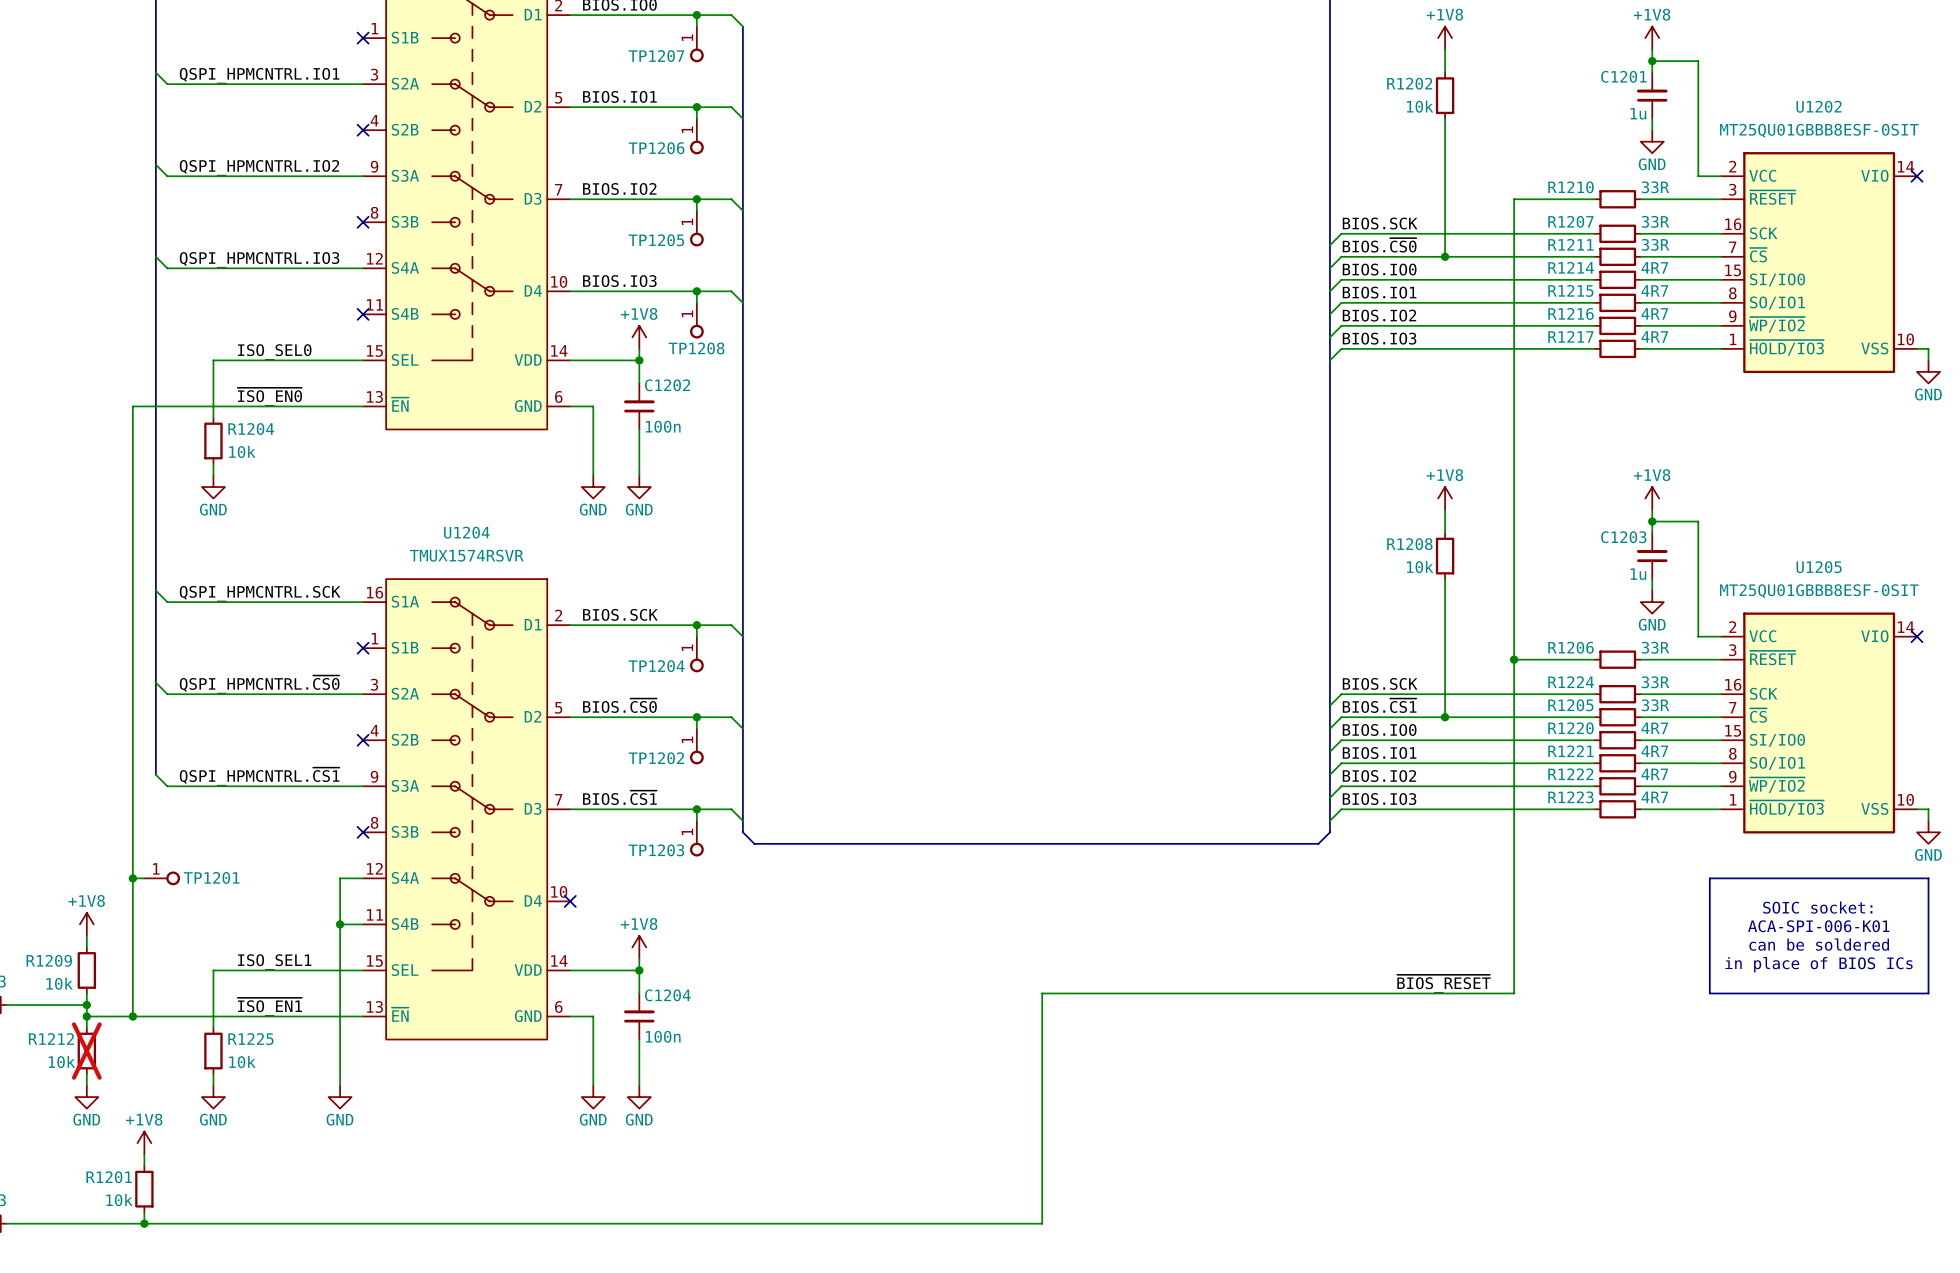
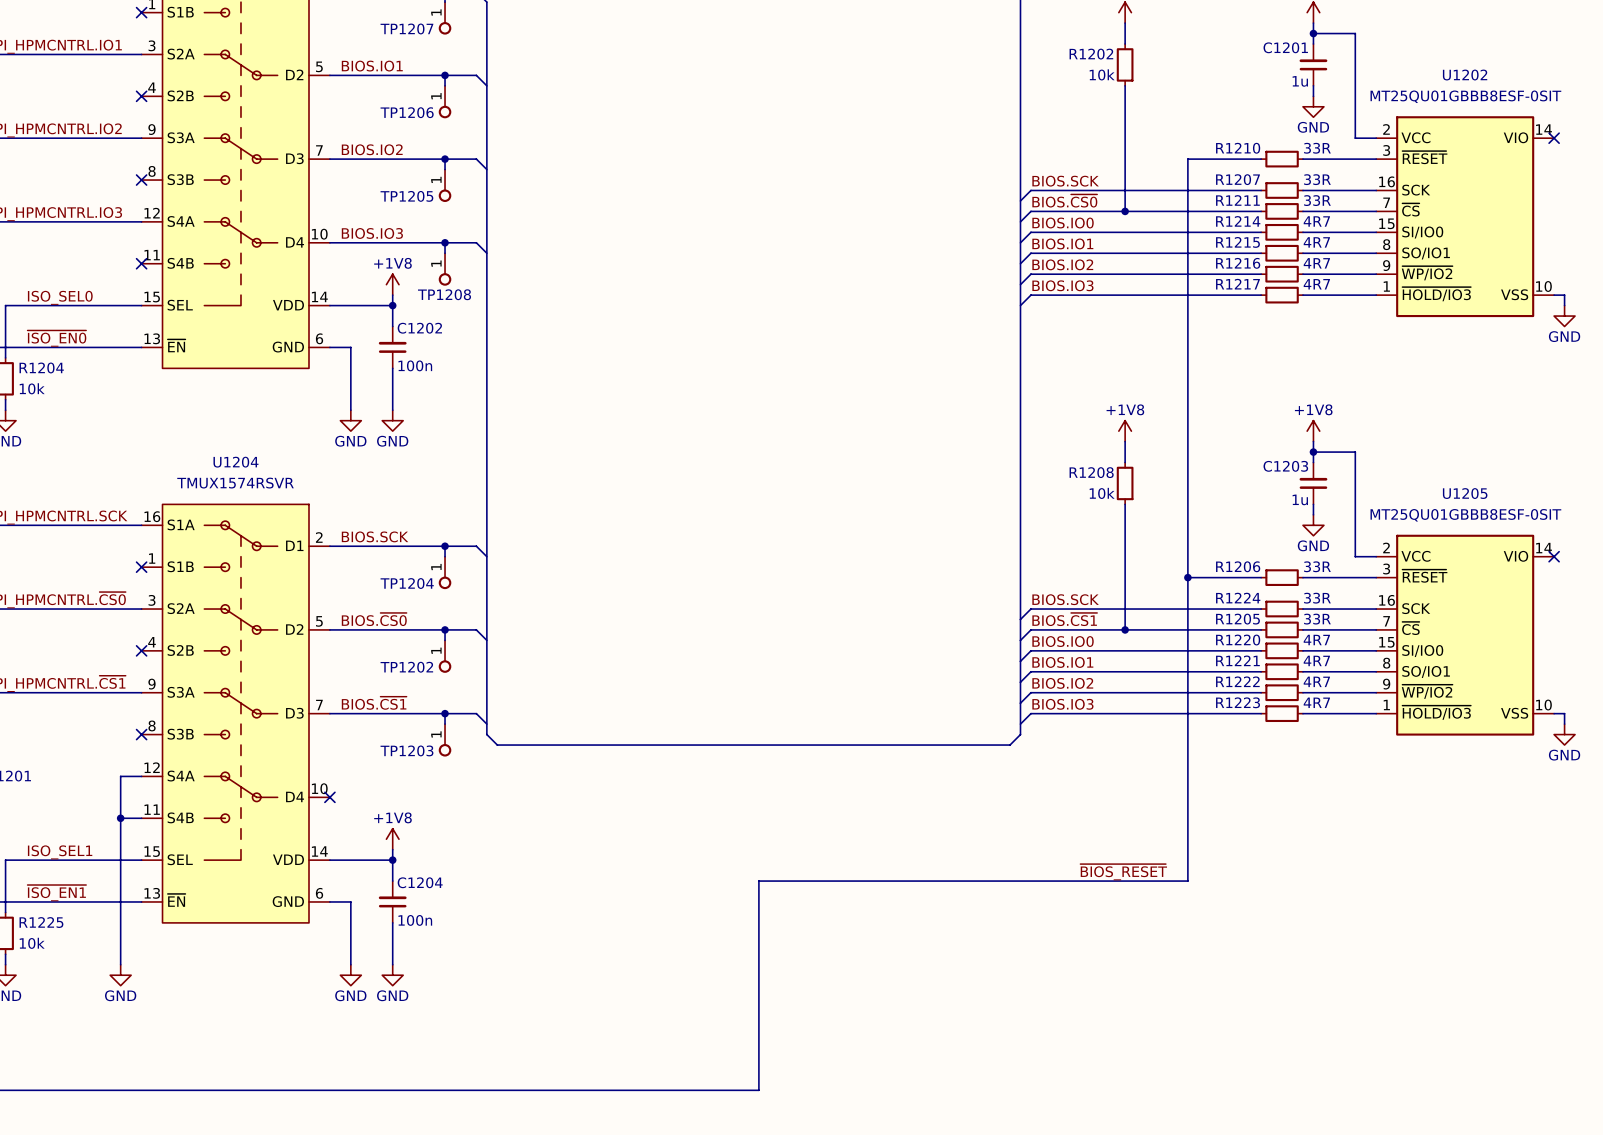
line: (1709, 878) (1928, 878) (1928, 993) (1709, 993) (1709, 878) -> none
text: SOIC socket: (1817, 907) -> none
text: ACA-SPI-006-K01 (1818, 926) -> none
text: can be soldered (1819, 944) -> none
text: in place of BIOS ICs (1819, 964) -> none

